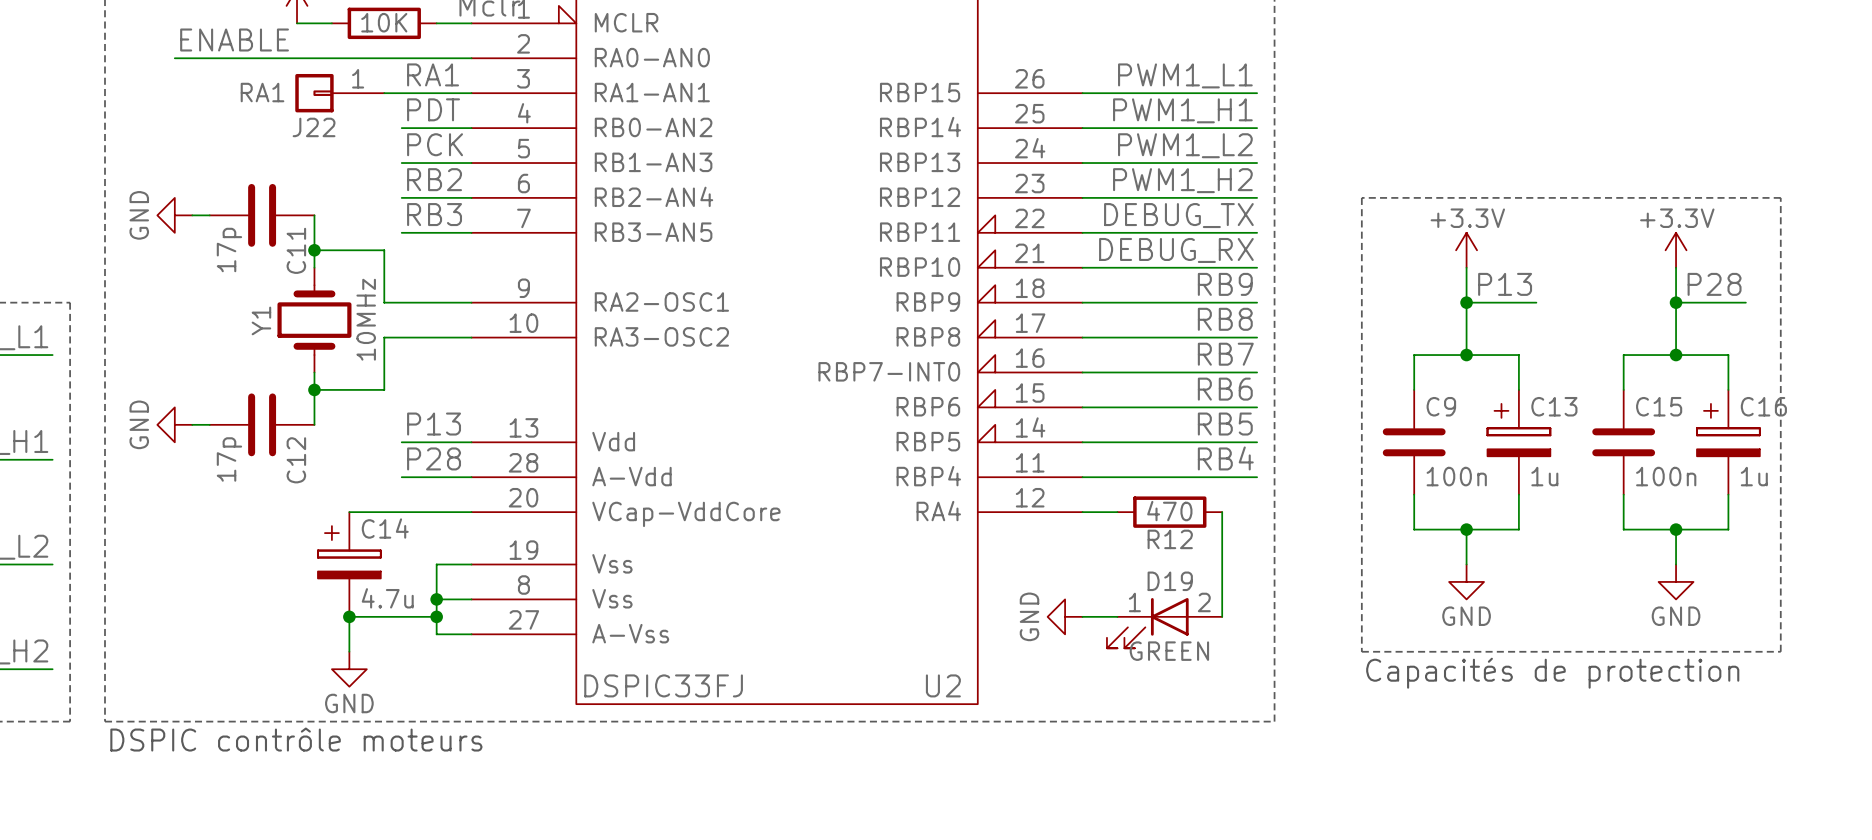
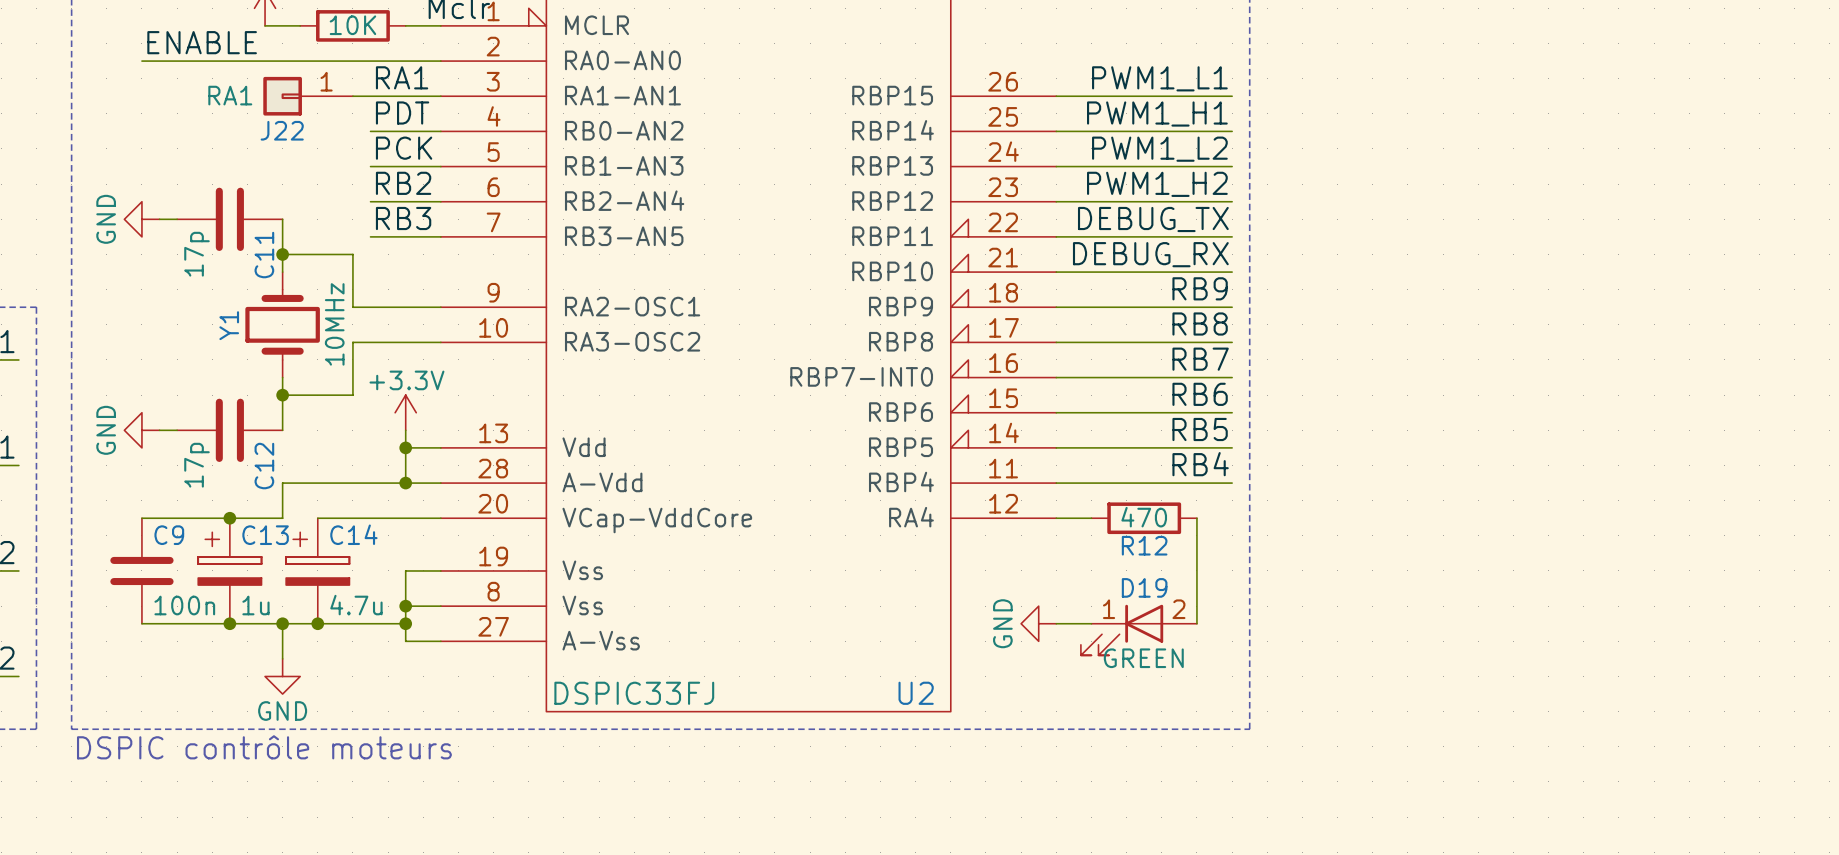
line: (1361, 197) (1361, 651) (1780, 651) (1780, 197) (1361, 197) -> none
power symbol: +3.3V (1466, 250) -> none
power symbol: +3.3V (1676, 250) -> none
wire: (1466, 267) (1466, 355) -> none
wire: (1676, 267) (1676, 355) -> none
label: P13 (1505, 284) -> none
label: P28 (1714, 284) -> none
wire: (1466, 302) (1536, 302) -> none
junction: (1466, 302) -> none
wire: (1676, 302) (1745, 302) -> none
junction: (1676, 302) -> none
junction: (1466, 355) -> none
junction: (1676, 355) -> none
wire: (1414, 389) (1414, 355) (1518, 355) (1518, 389) -> none
wire: (1623, 389) (1623, 355) (1728, 355) (1728, 389) -> none
power symbol: none -> +3.3V (405, 412)
label: P13 (434, 424) -> none
wire: none -> (405, 430) (405, 483)
wire: (401, 442) (436, 442) -> none
junction: none -> (405, 447)
C9 position: (1414, 442) -> (141, 570)
C13 position: (1518, 442) -> (229, 570)
C15: 100n (1623, 442) -> none
C16: 1u (1728, 442) -> none
label: P28 (434, 458) -> none
wire: none -> (370, 483) (282, 483) (282, 518) (141, 518)
junction: none -> (405, 483)
wire: (1414, 494) (1414, 529) (1518, 529) (1518, 494) -> none
wire: (1623, 494) (1623, 529) (1728, 529) (1728, 494) -> none
junction: none -> (229, 518)
wire: (1466, 529) (1466, 564) -> none
junction: (1466, 529) -> none
wire: (1676, 529) (1676, 564) -> none
junction: (1676, 529) -> none
power symbol: GND (1466, 581) -> none
power symbol: GND (1676, 581) -> none
junction: none -> (229, 623)
wire: none -> (282, 623) (282, 658)
junction: none -> (282, 623)
wire: (349, 616) (349, 651) -> (317, 623) (141, 623)
power symbol position: GND (349, 669) -> GND (282, 676)
text: Capacités de protection (1552, 673) -> none

